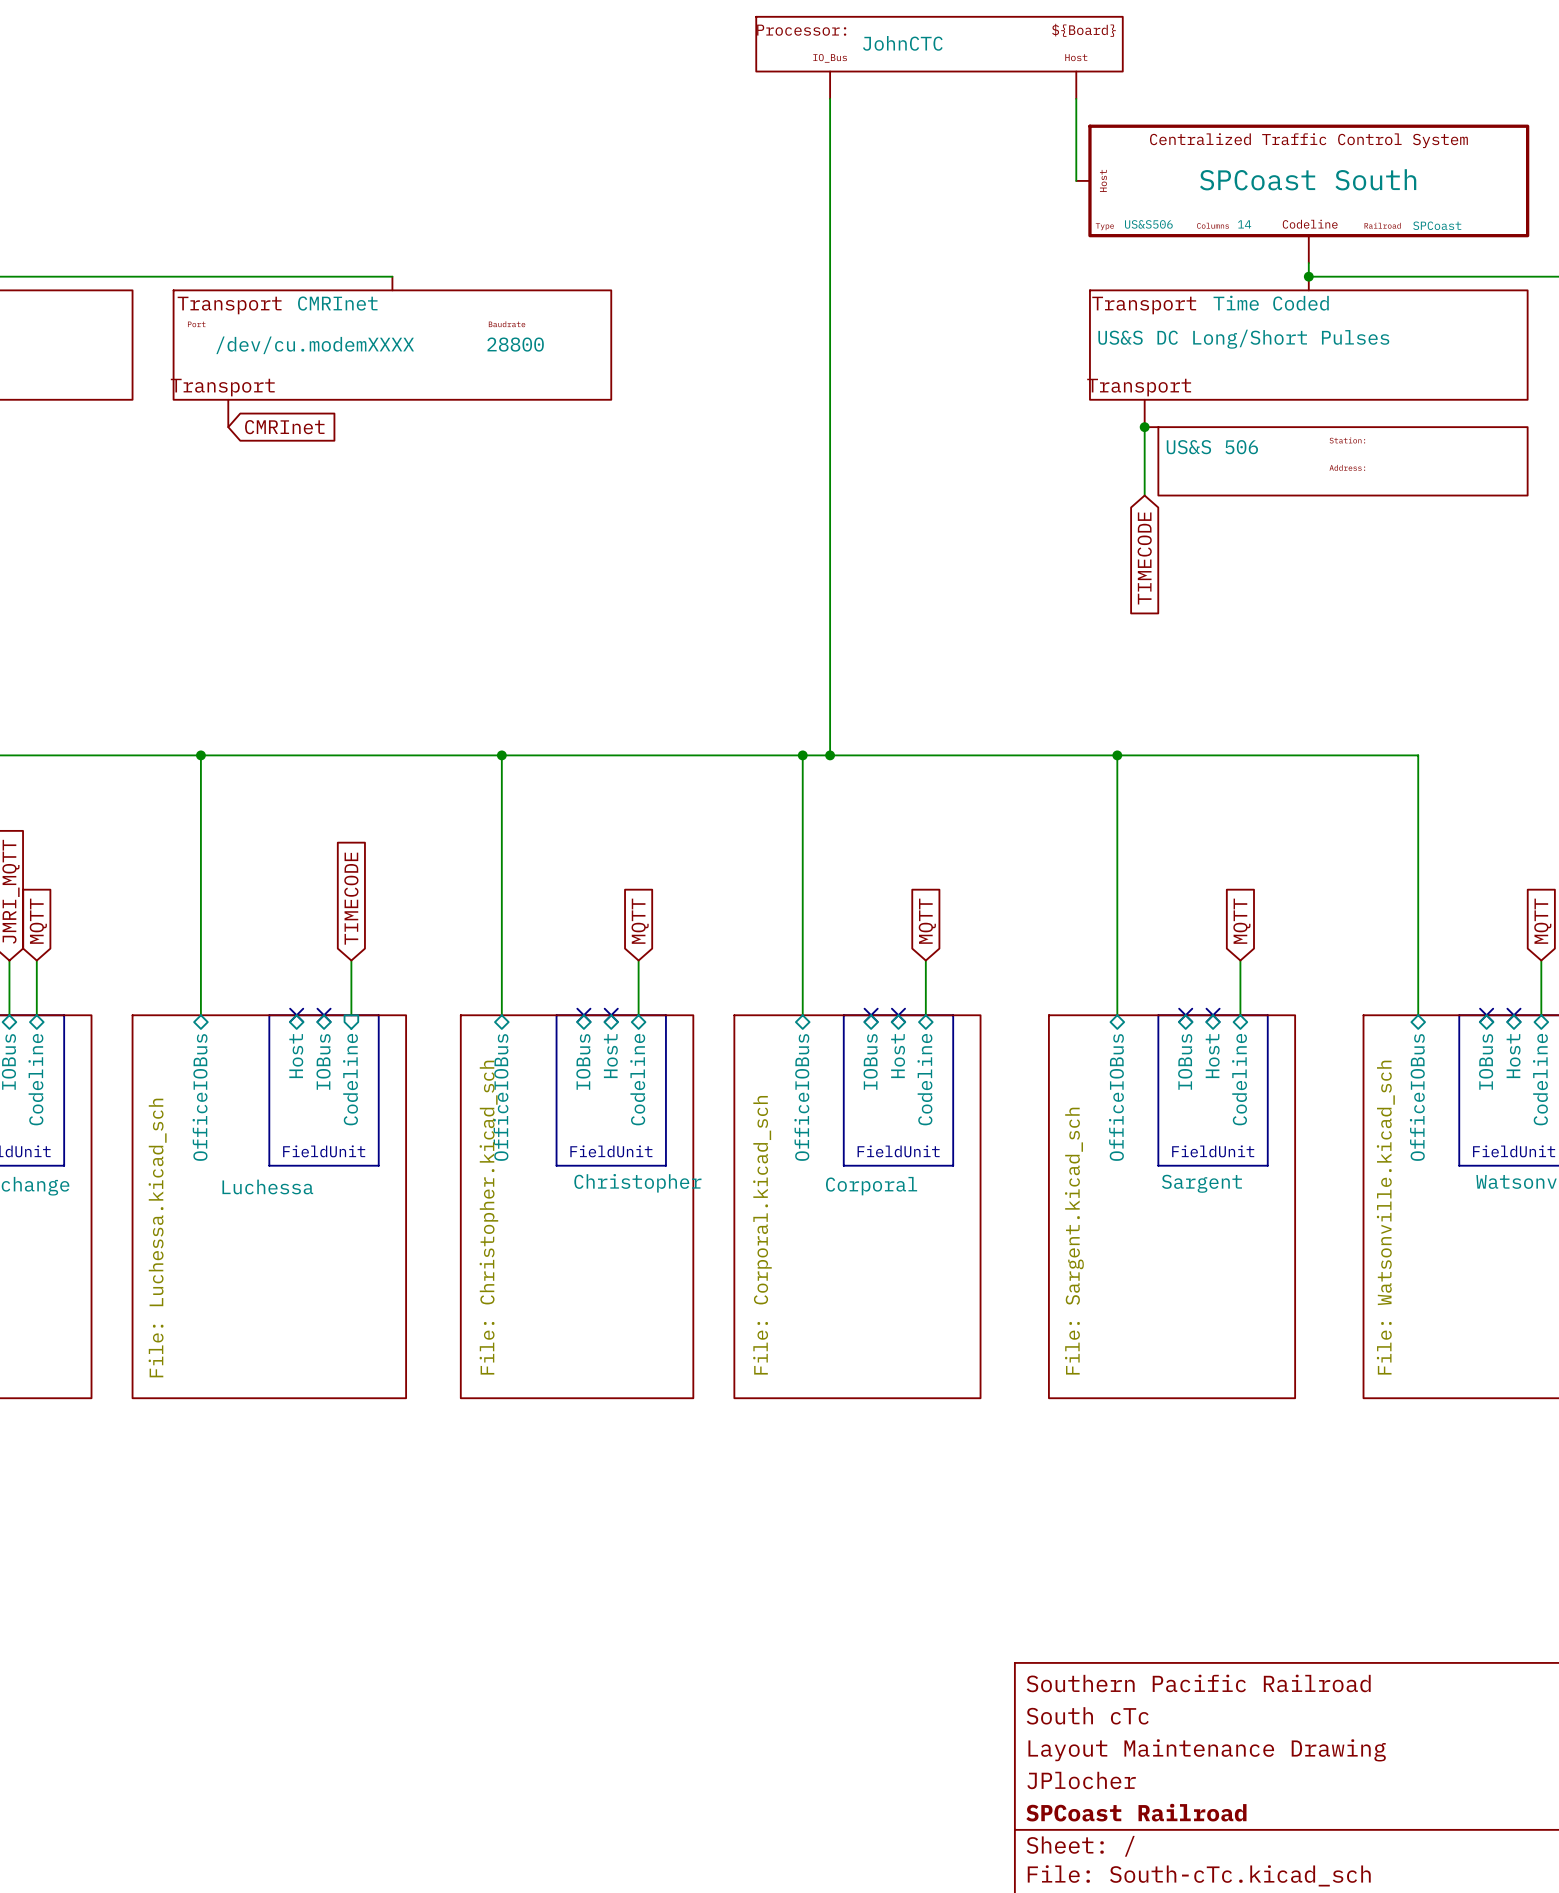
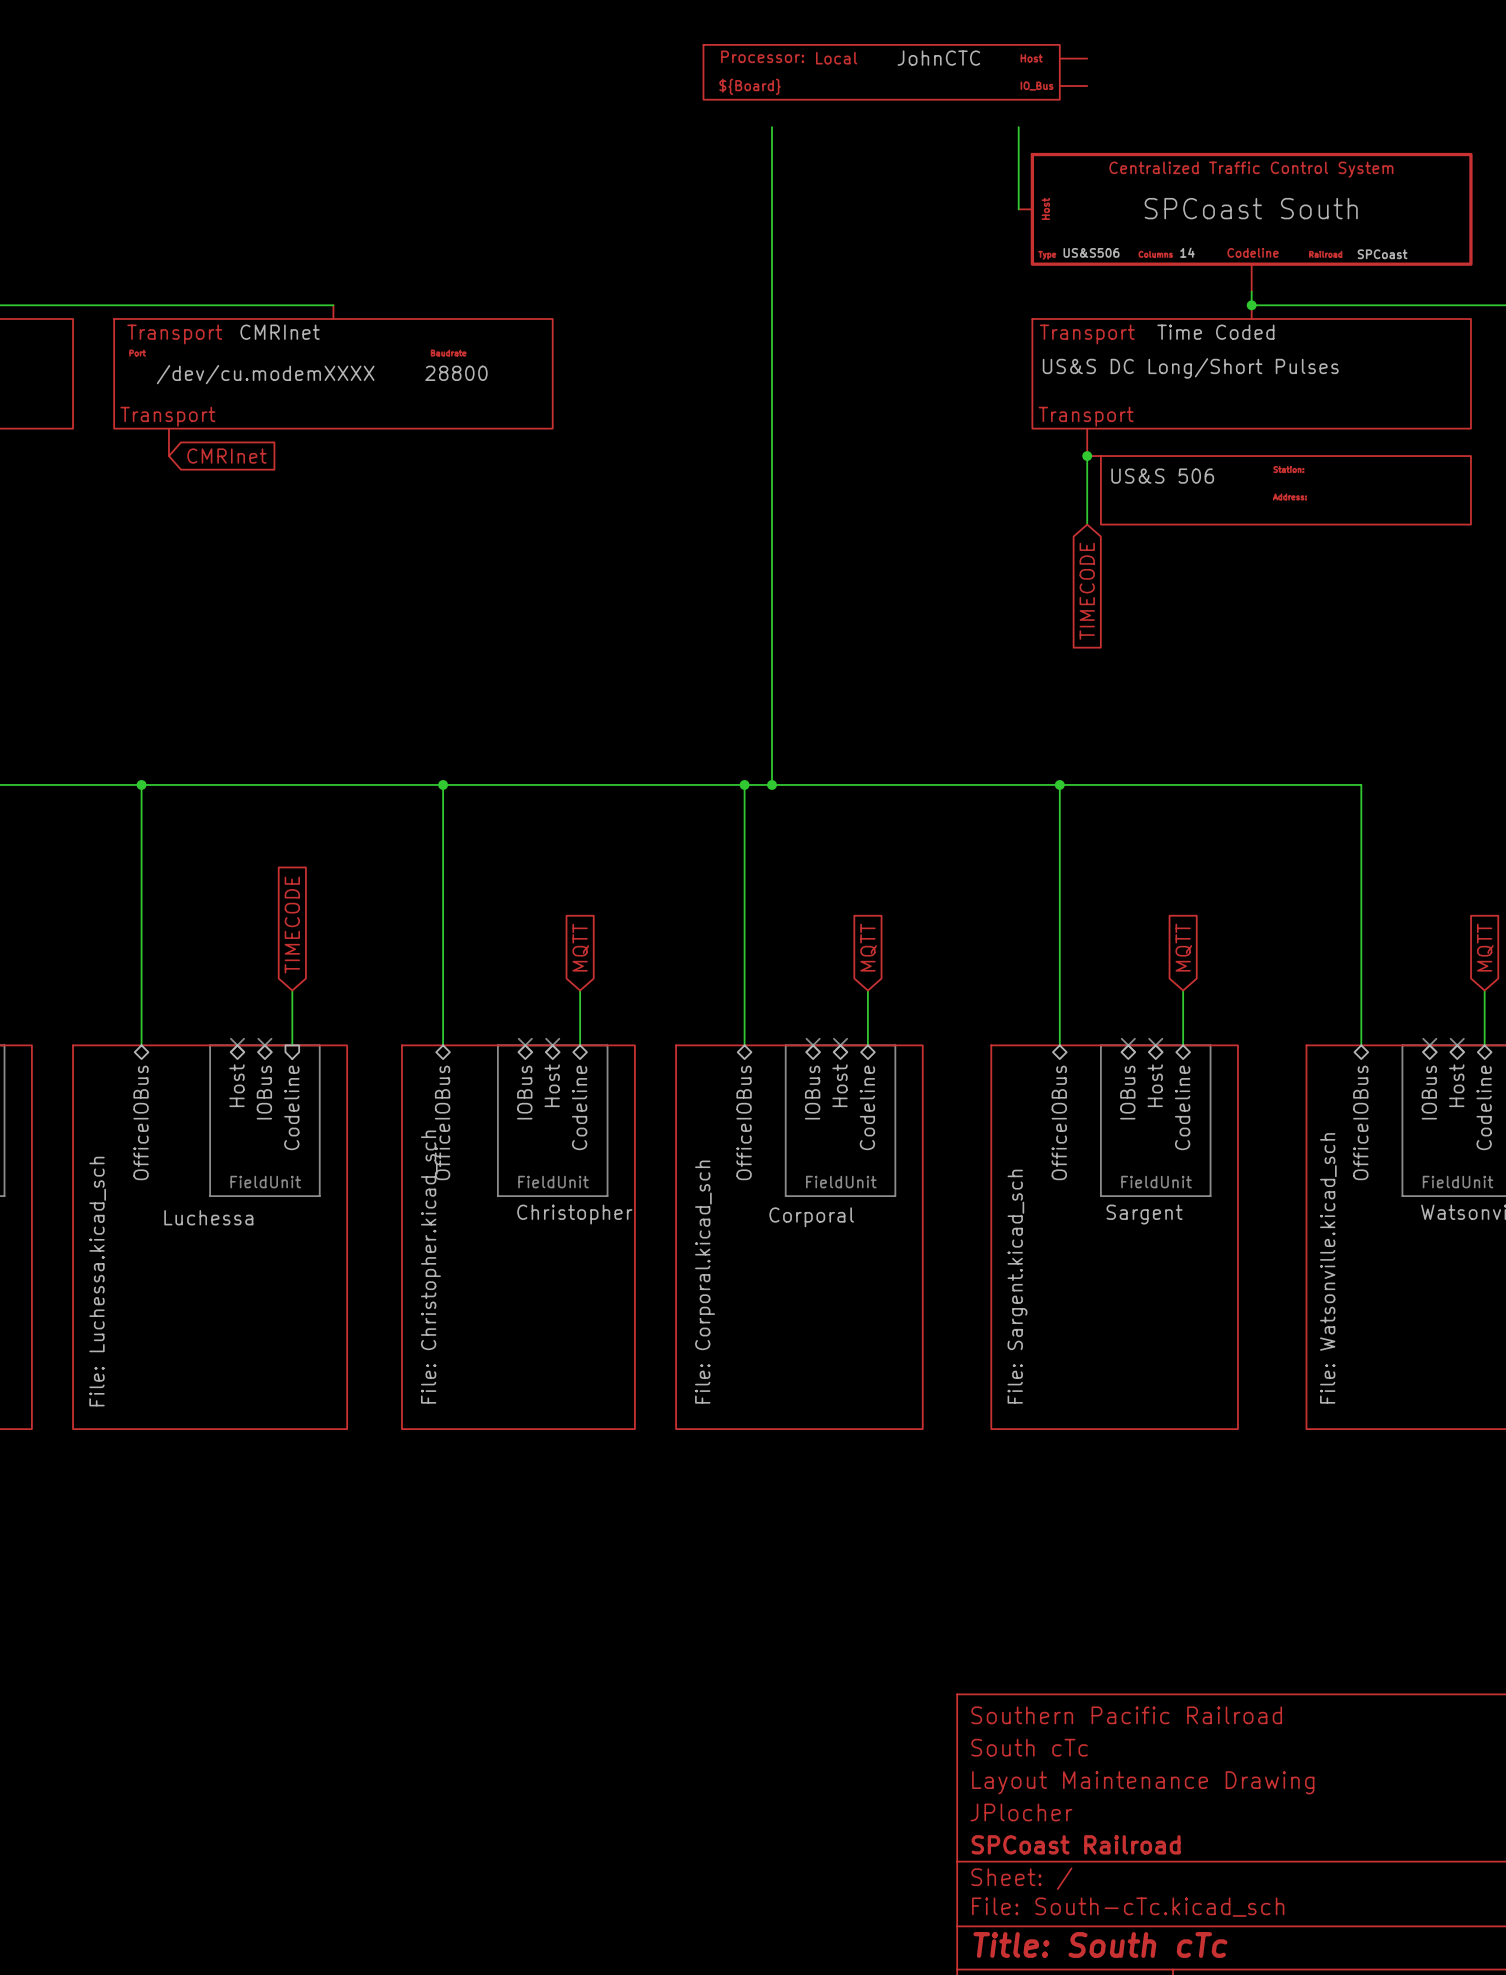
part: none -> JohnCTC (895, 72)
part: JohnCTC (939, 57) -> none

